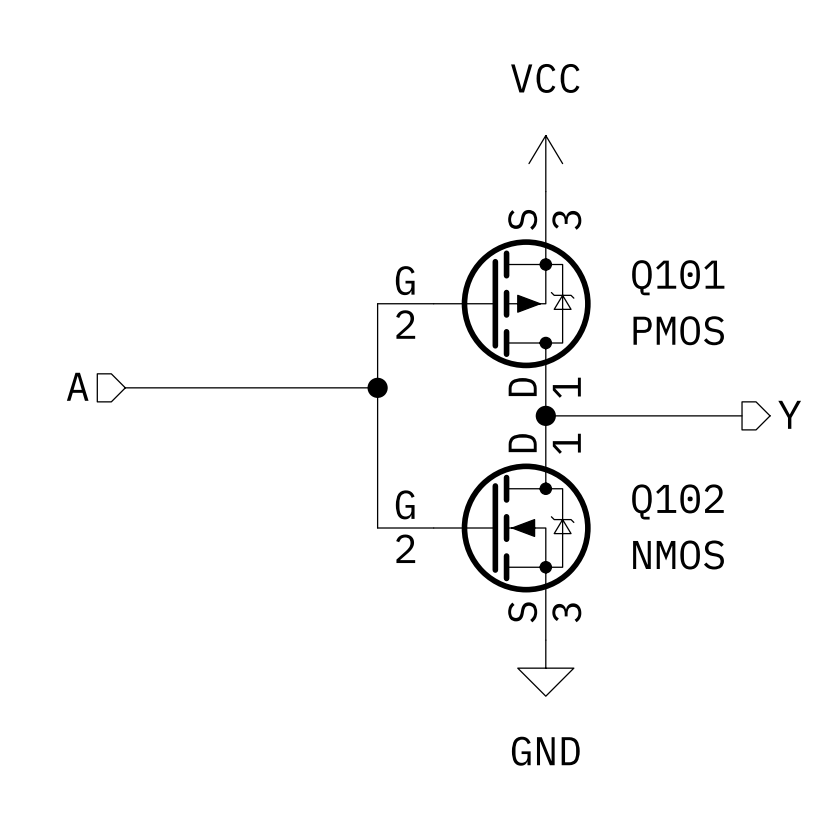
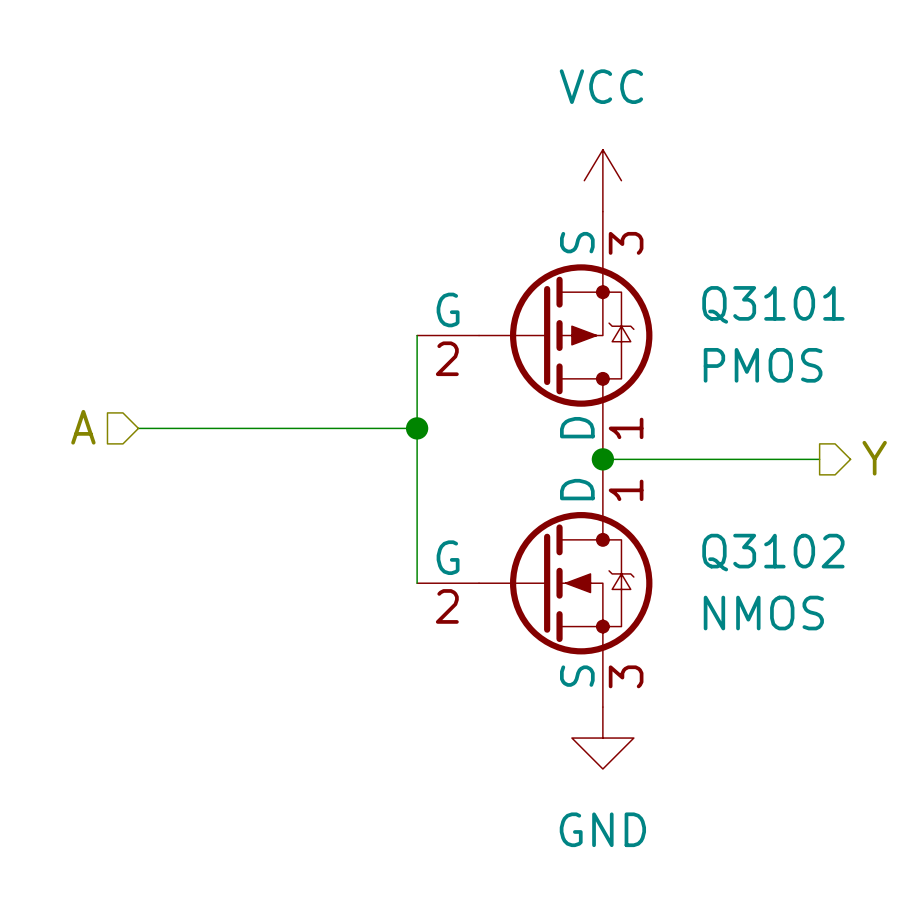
Q101 name: Q101 (678, 277) -> Q3101 (773, 304)
Q102 name: Q102 (677, 501) -> Q3102 (773, 552)

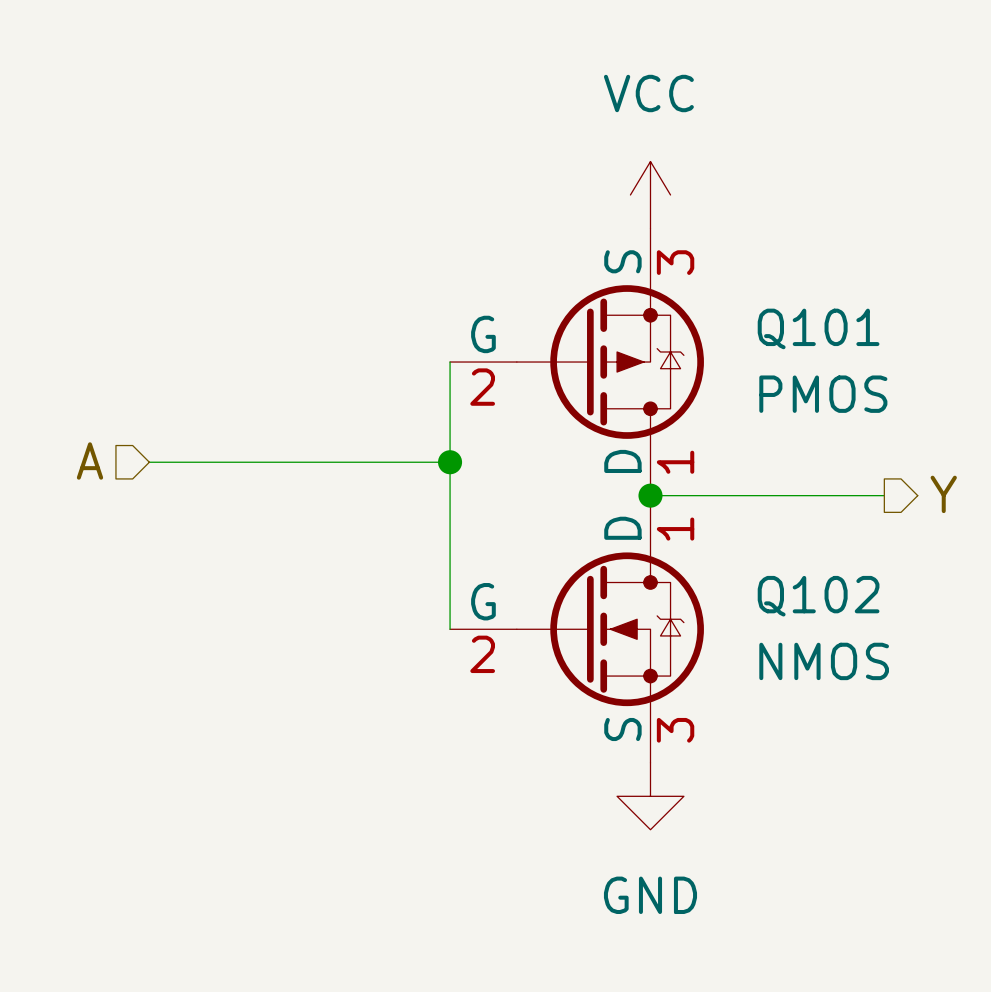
Q3101 name: Q3101 (773, 304) -> Q101 (818, 328)
Q3102 name: Q3102 (773, 552) -> Q102 (818, 596)

